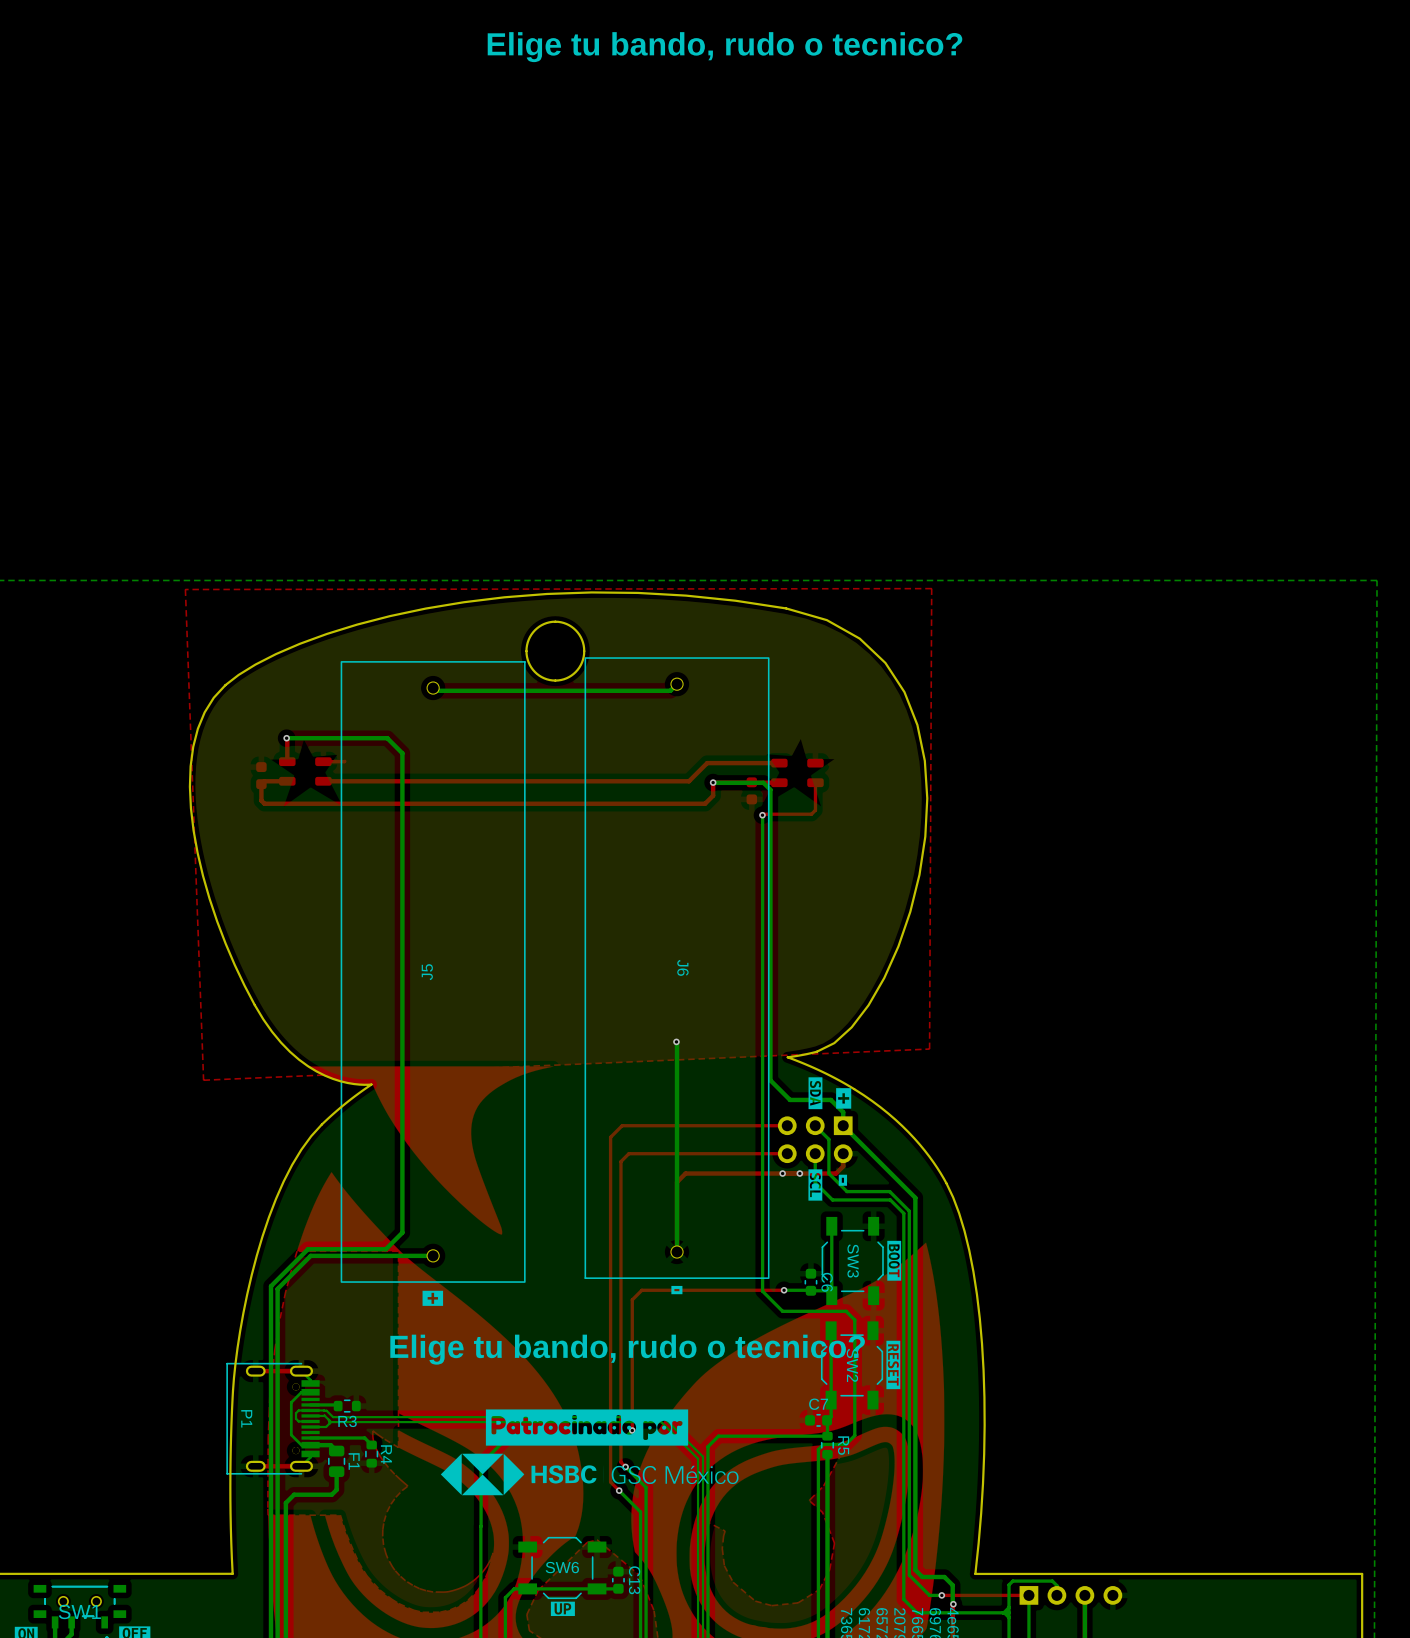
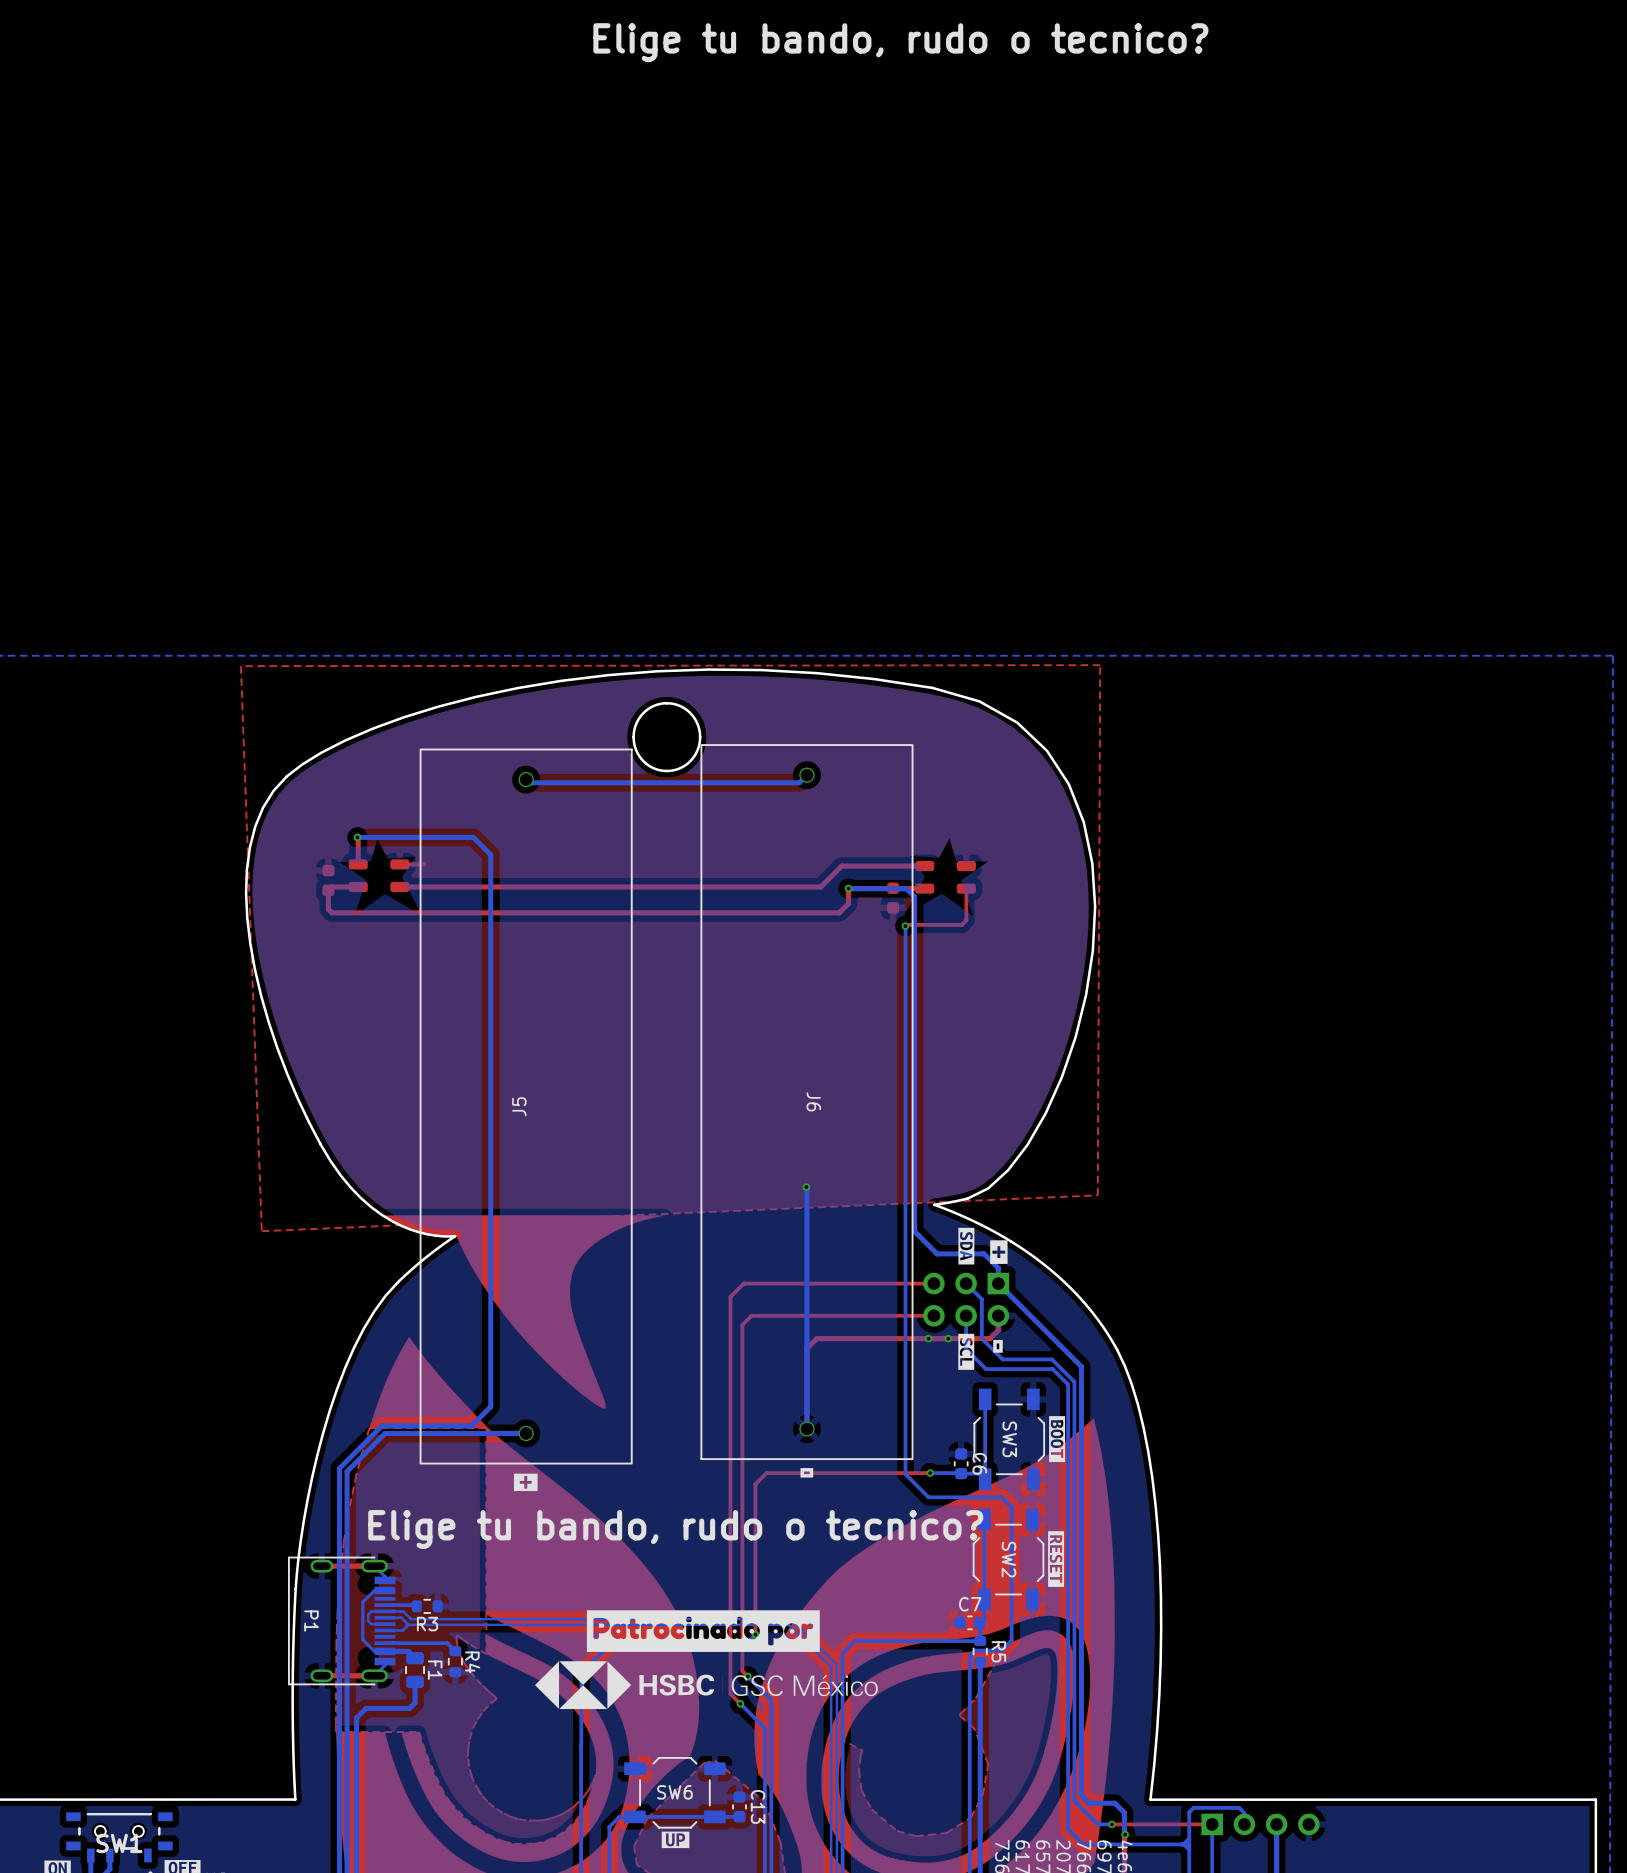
text position: Elige tu bando, rudo o tecnico? (627, 1349) -> Elige tu bando, rudo o tecnico? (675, 1529)

